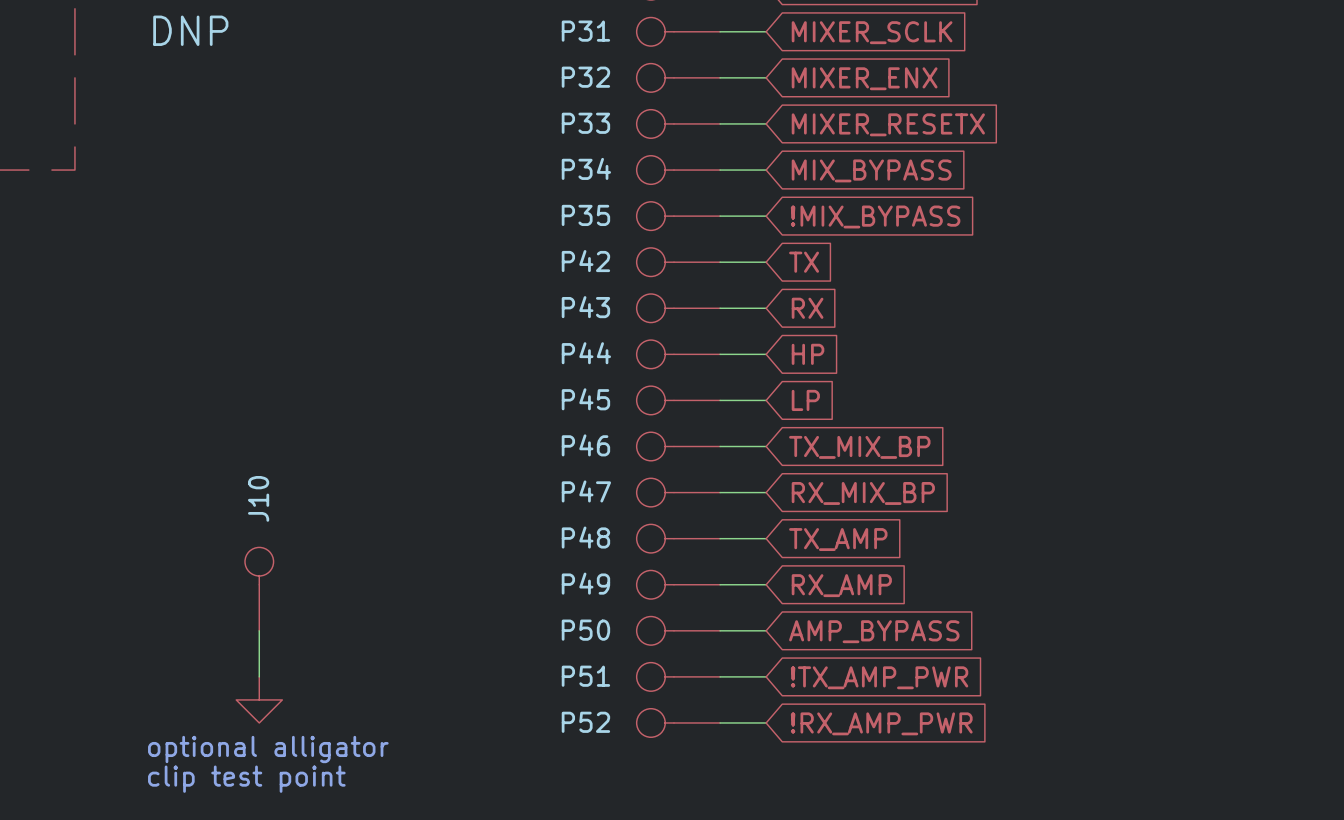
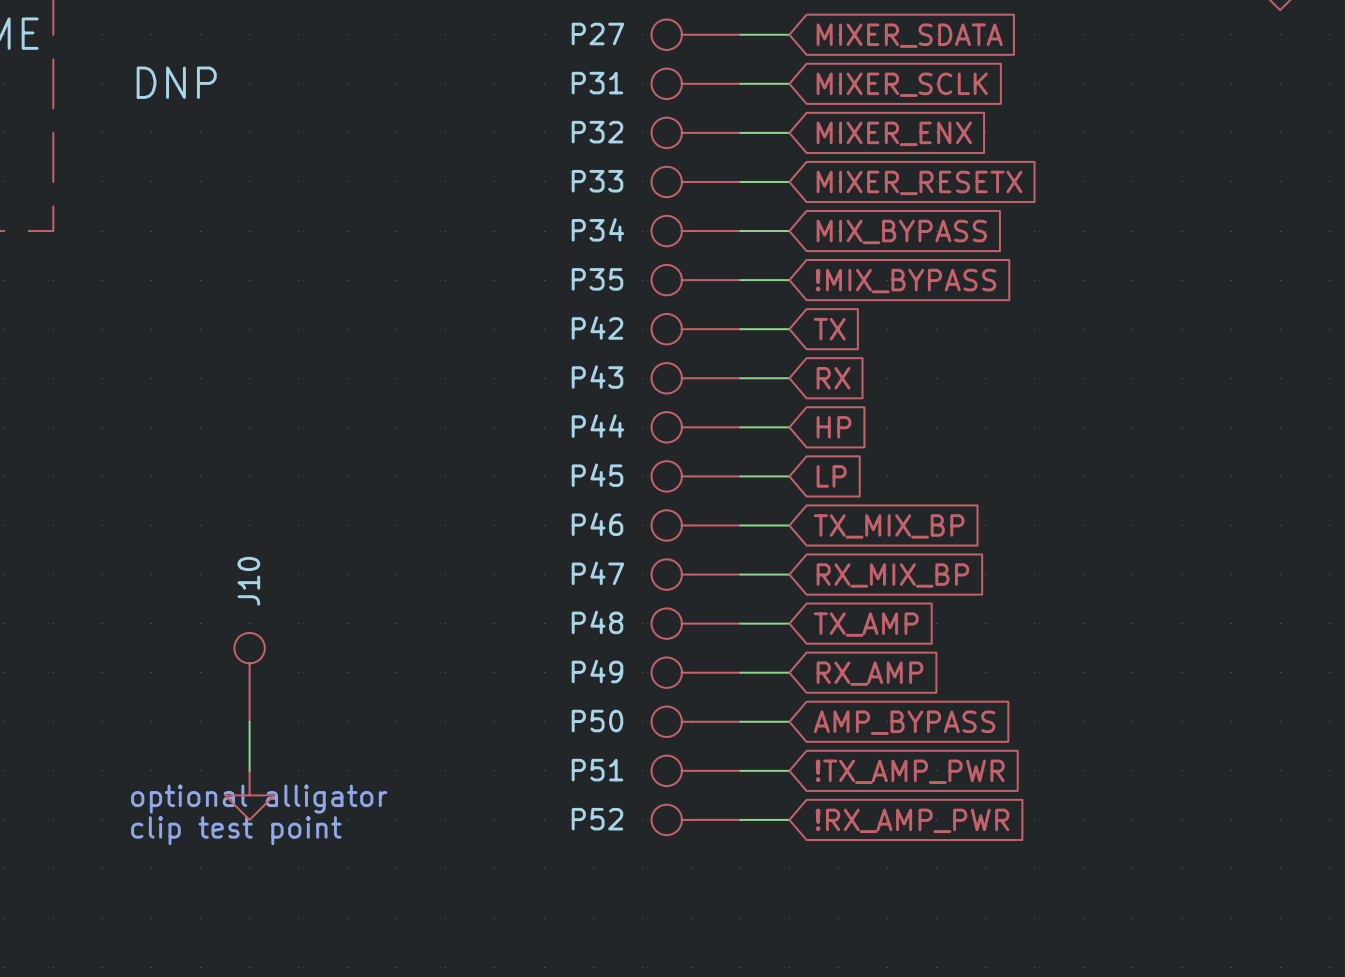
text position: optional alligator (268, 749) -> optional alligator (259, 799)
text position: clip test point (246, 779) -> clip test point (236, 830)

